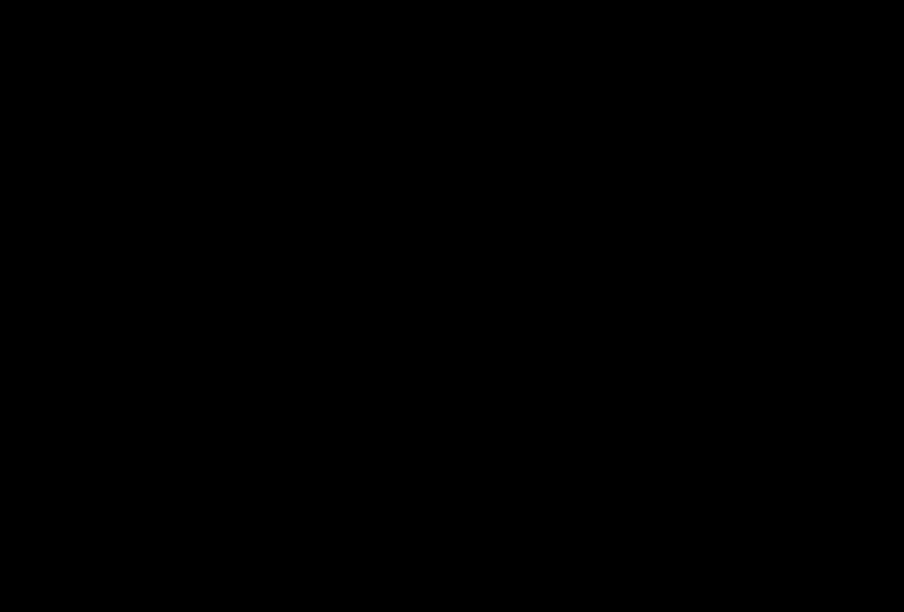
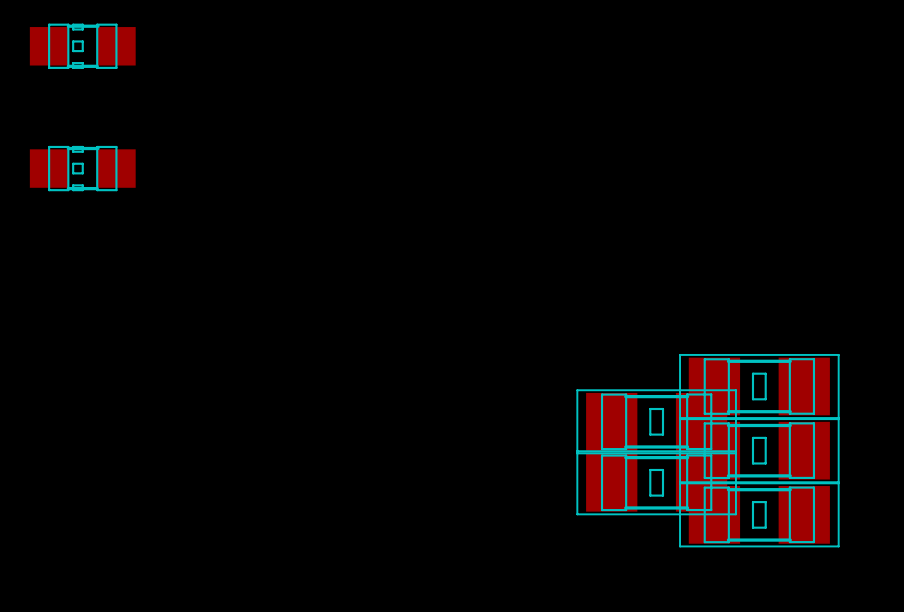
part: none -> (82, 46)
part: none -> (82, 168)
part: none -> (759, 386)
part: none -> (656, 421)
part: none -> (759, 450)
part: none -> (656, 482)
part: none -> (759, 514)

